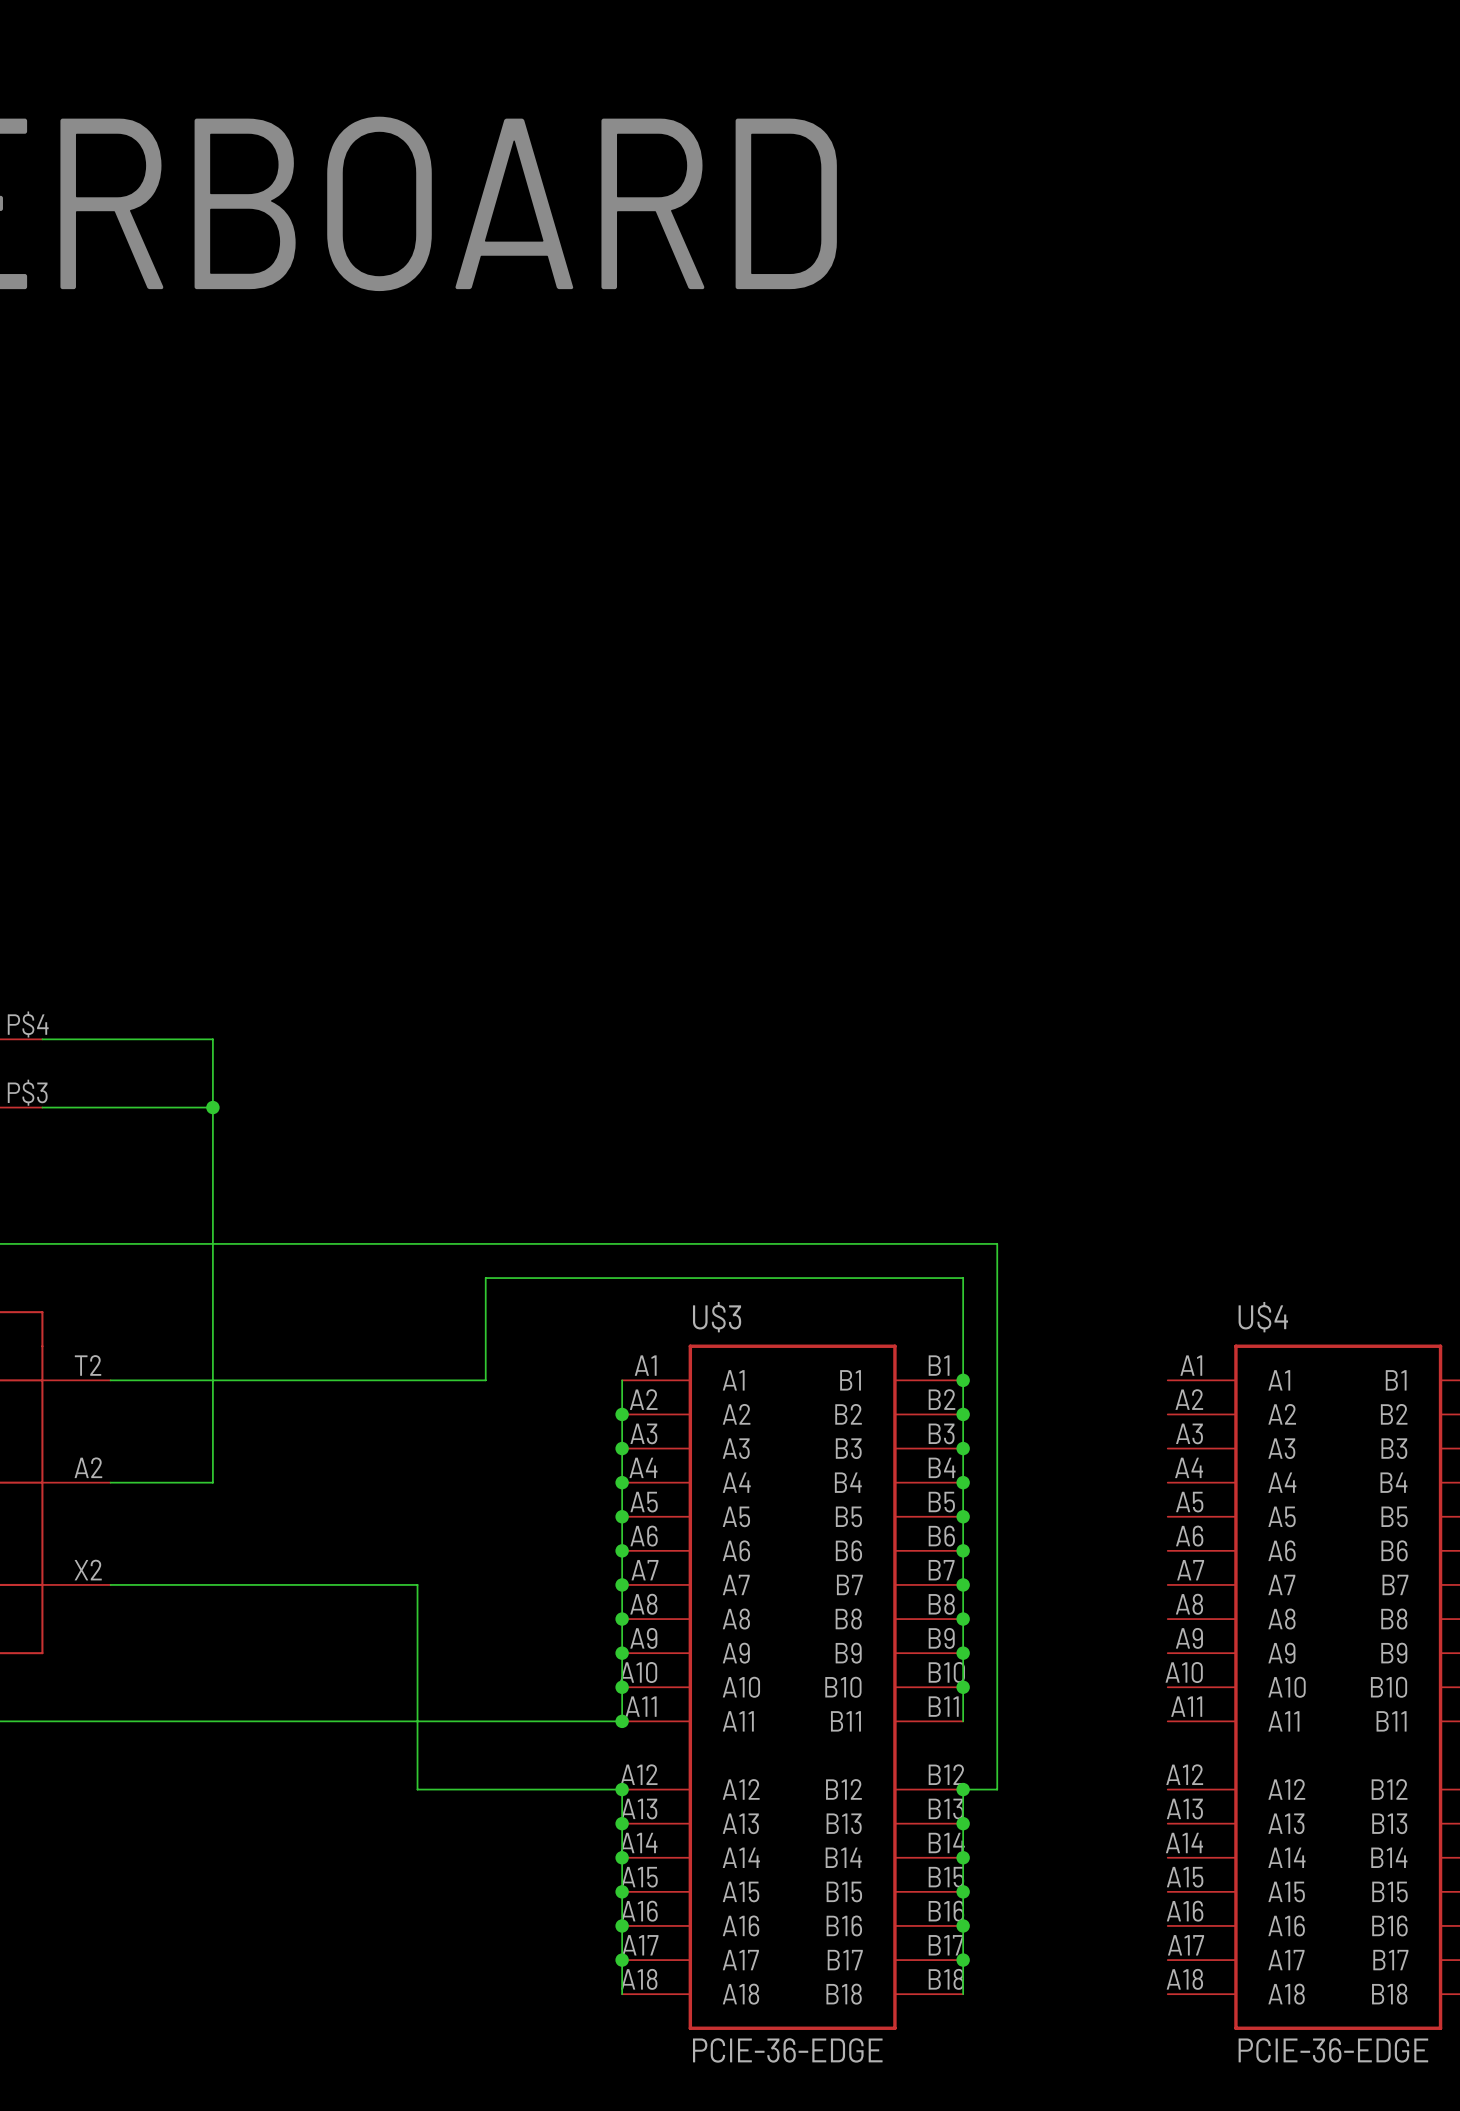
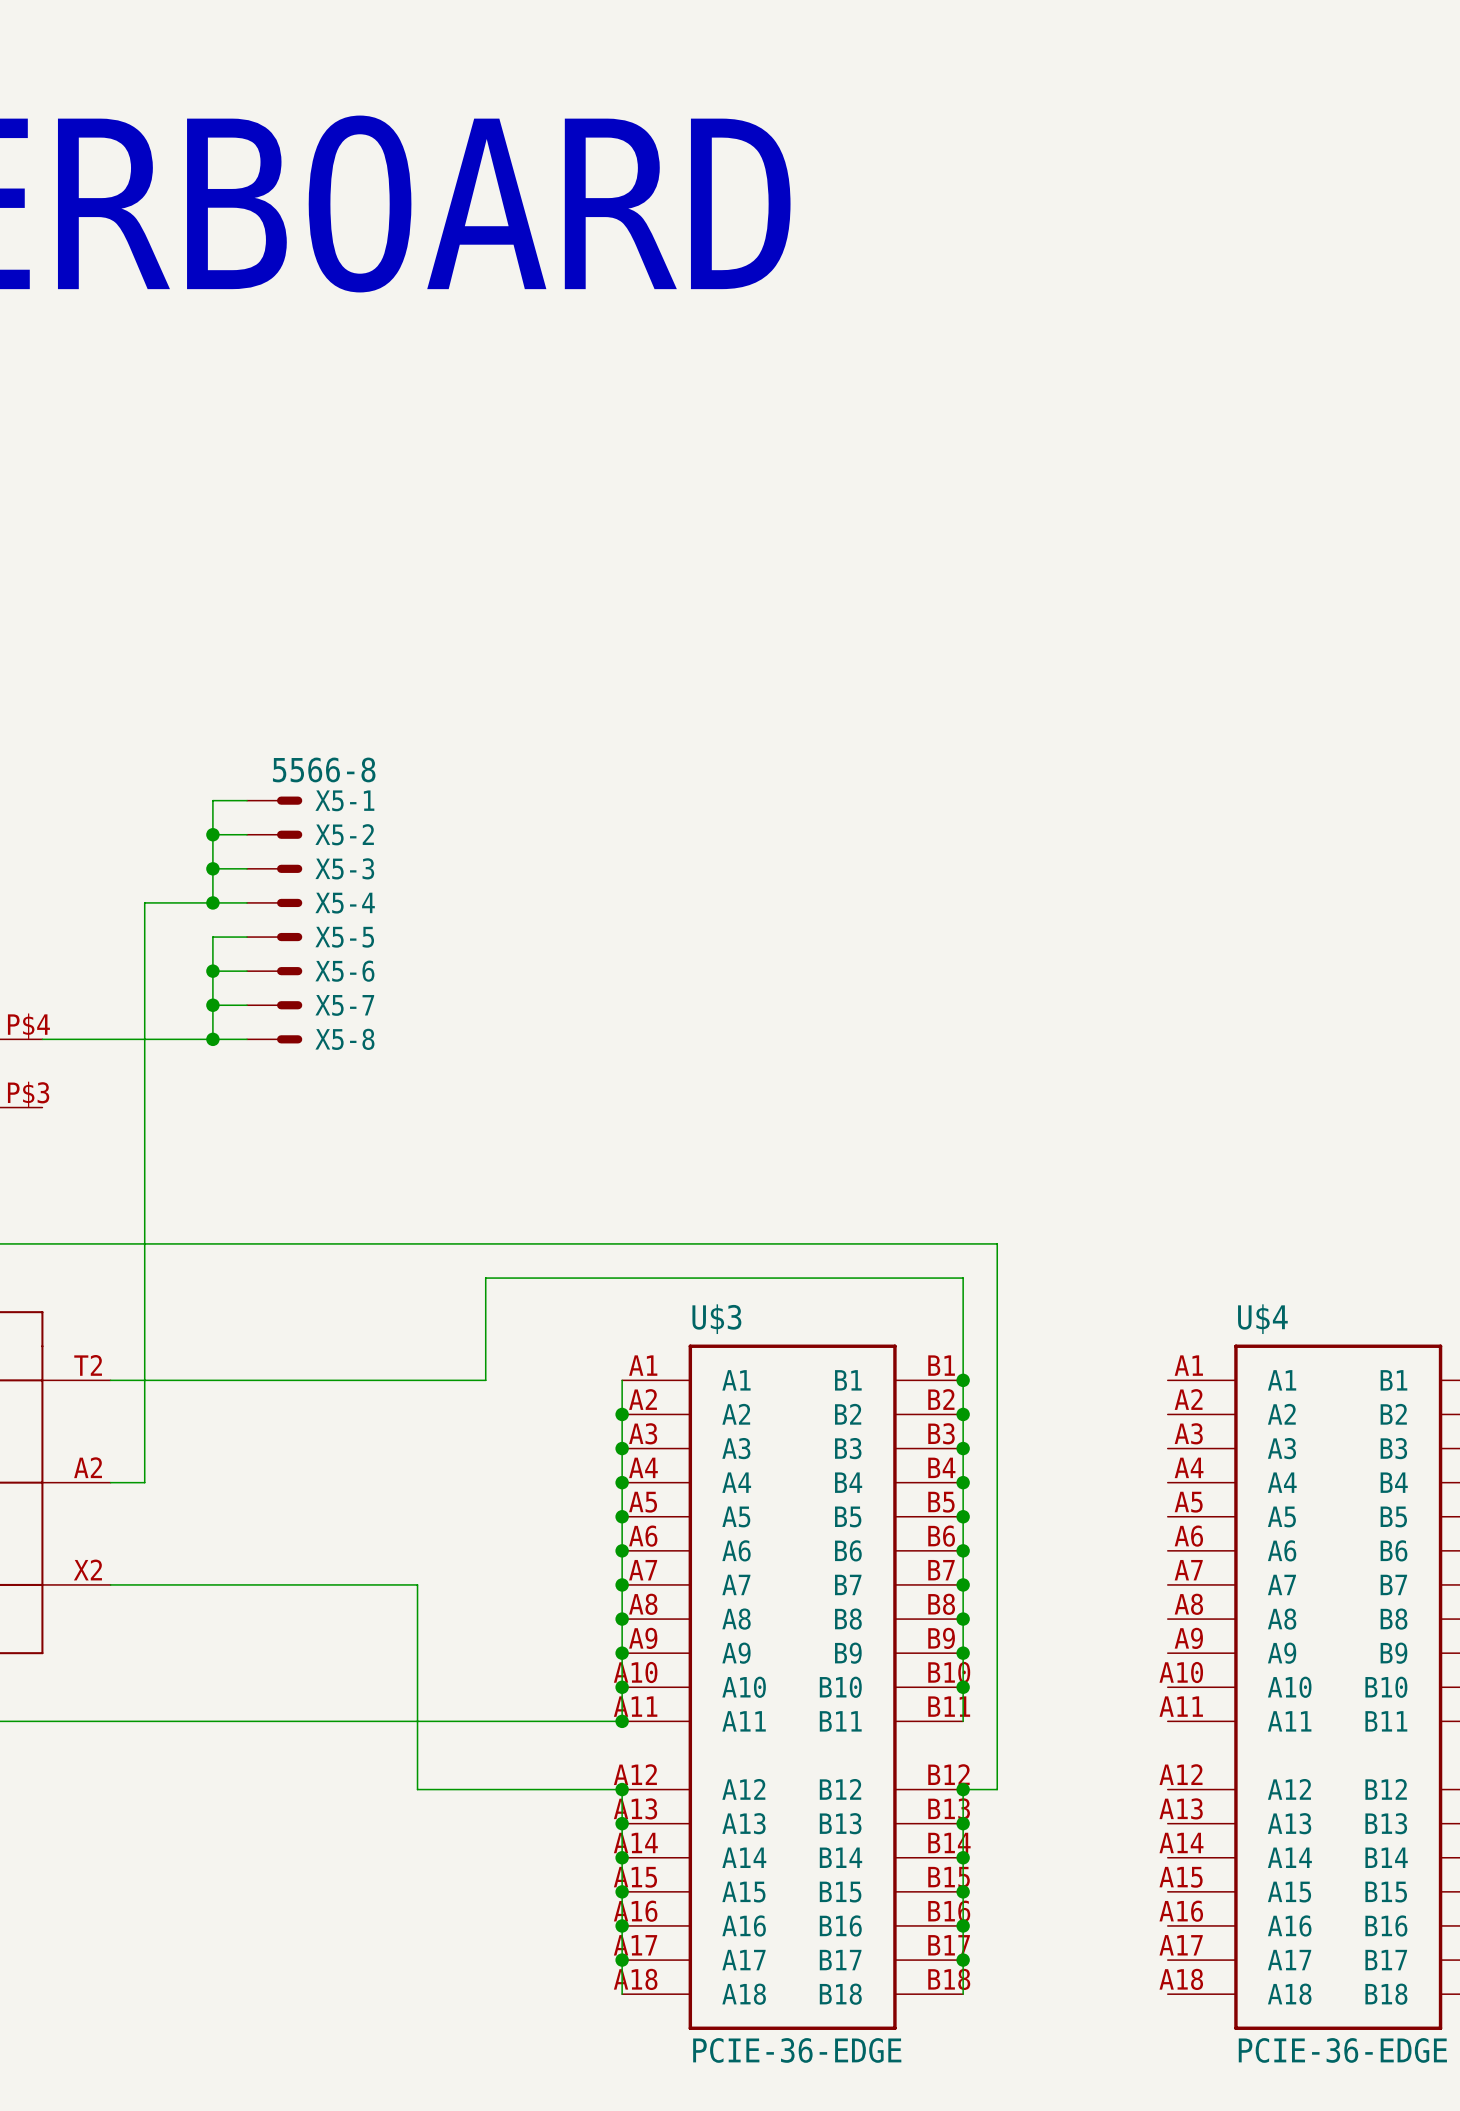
wire: none -> (247, 800) (212, 800) (212, 902)
X5-1: none -> 5566-8 (274, 800)
wire: none -> (212, 834) (247, 834)
junction: none -> (212, 834)
X5-2: none -> (274, 834)
wire: none -> (212, 868) (247, 868)
junction: none -> (212, 868)
X5-3: none -> (274, 868)
junction: none -> (212, 902)
X5-4: none -> (274, 902)
wire: none -> (247, 937) (212, 937) (212, 1039) (247, 1039)
X5-5: none -> (274, 937)
wire: none -> (212, 971) (247, 971)
junction: none -> (212, 971)
X5-6: none -> (274, 971)
wire: none -> (212, 1005) (247, 1005)
junction: none -> (212, 1005)
X5-7: none -> (274, 1005)
wire: (212, 1039) (212, 1482) (144, 1482) -> (247, 902) (144, 902) (144, 1482)
junction: none -> (212, 1039)
X5-8: none -> (274, 1039)
wire: (42, 1107) (212, 1107) -> none
junction: (212, 1107) -> none

